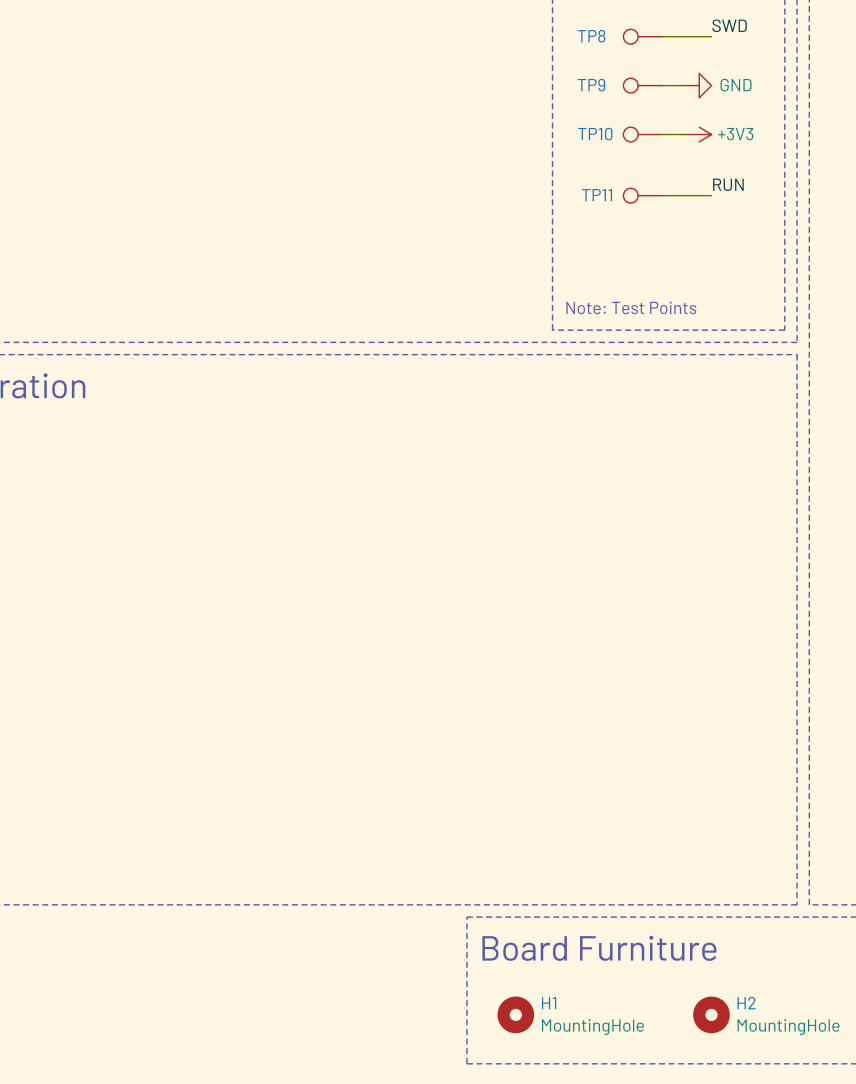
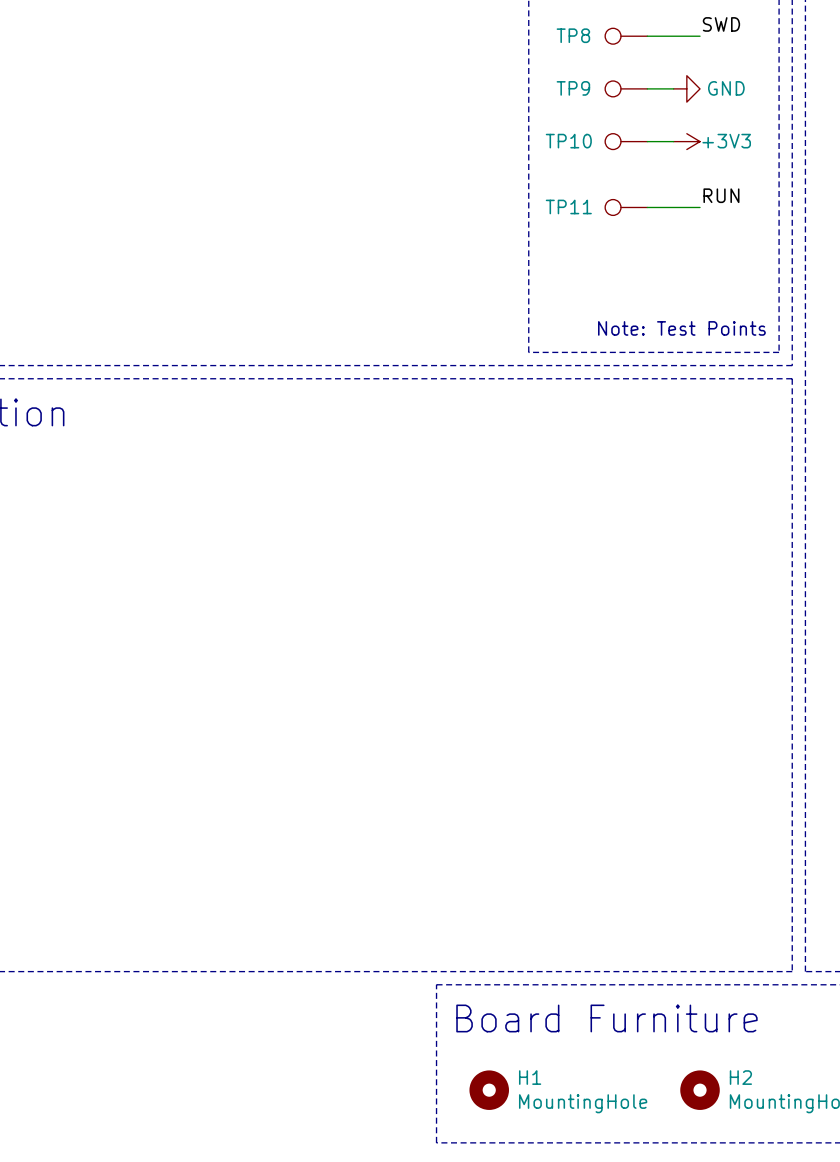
text position: Note: Test Points (631, 307) -> Note: Test Points (681, 328)

